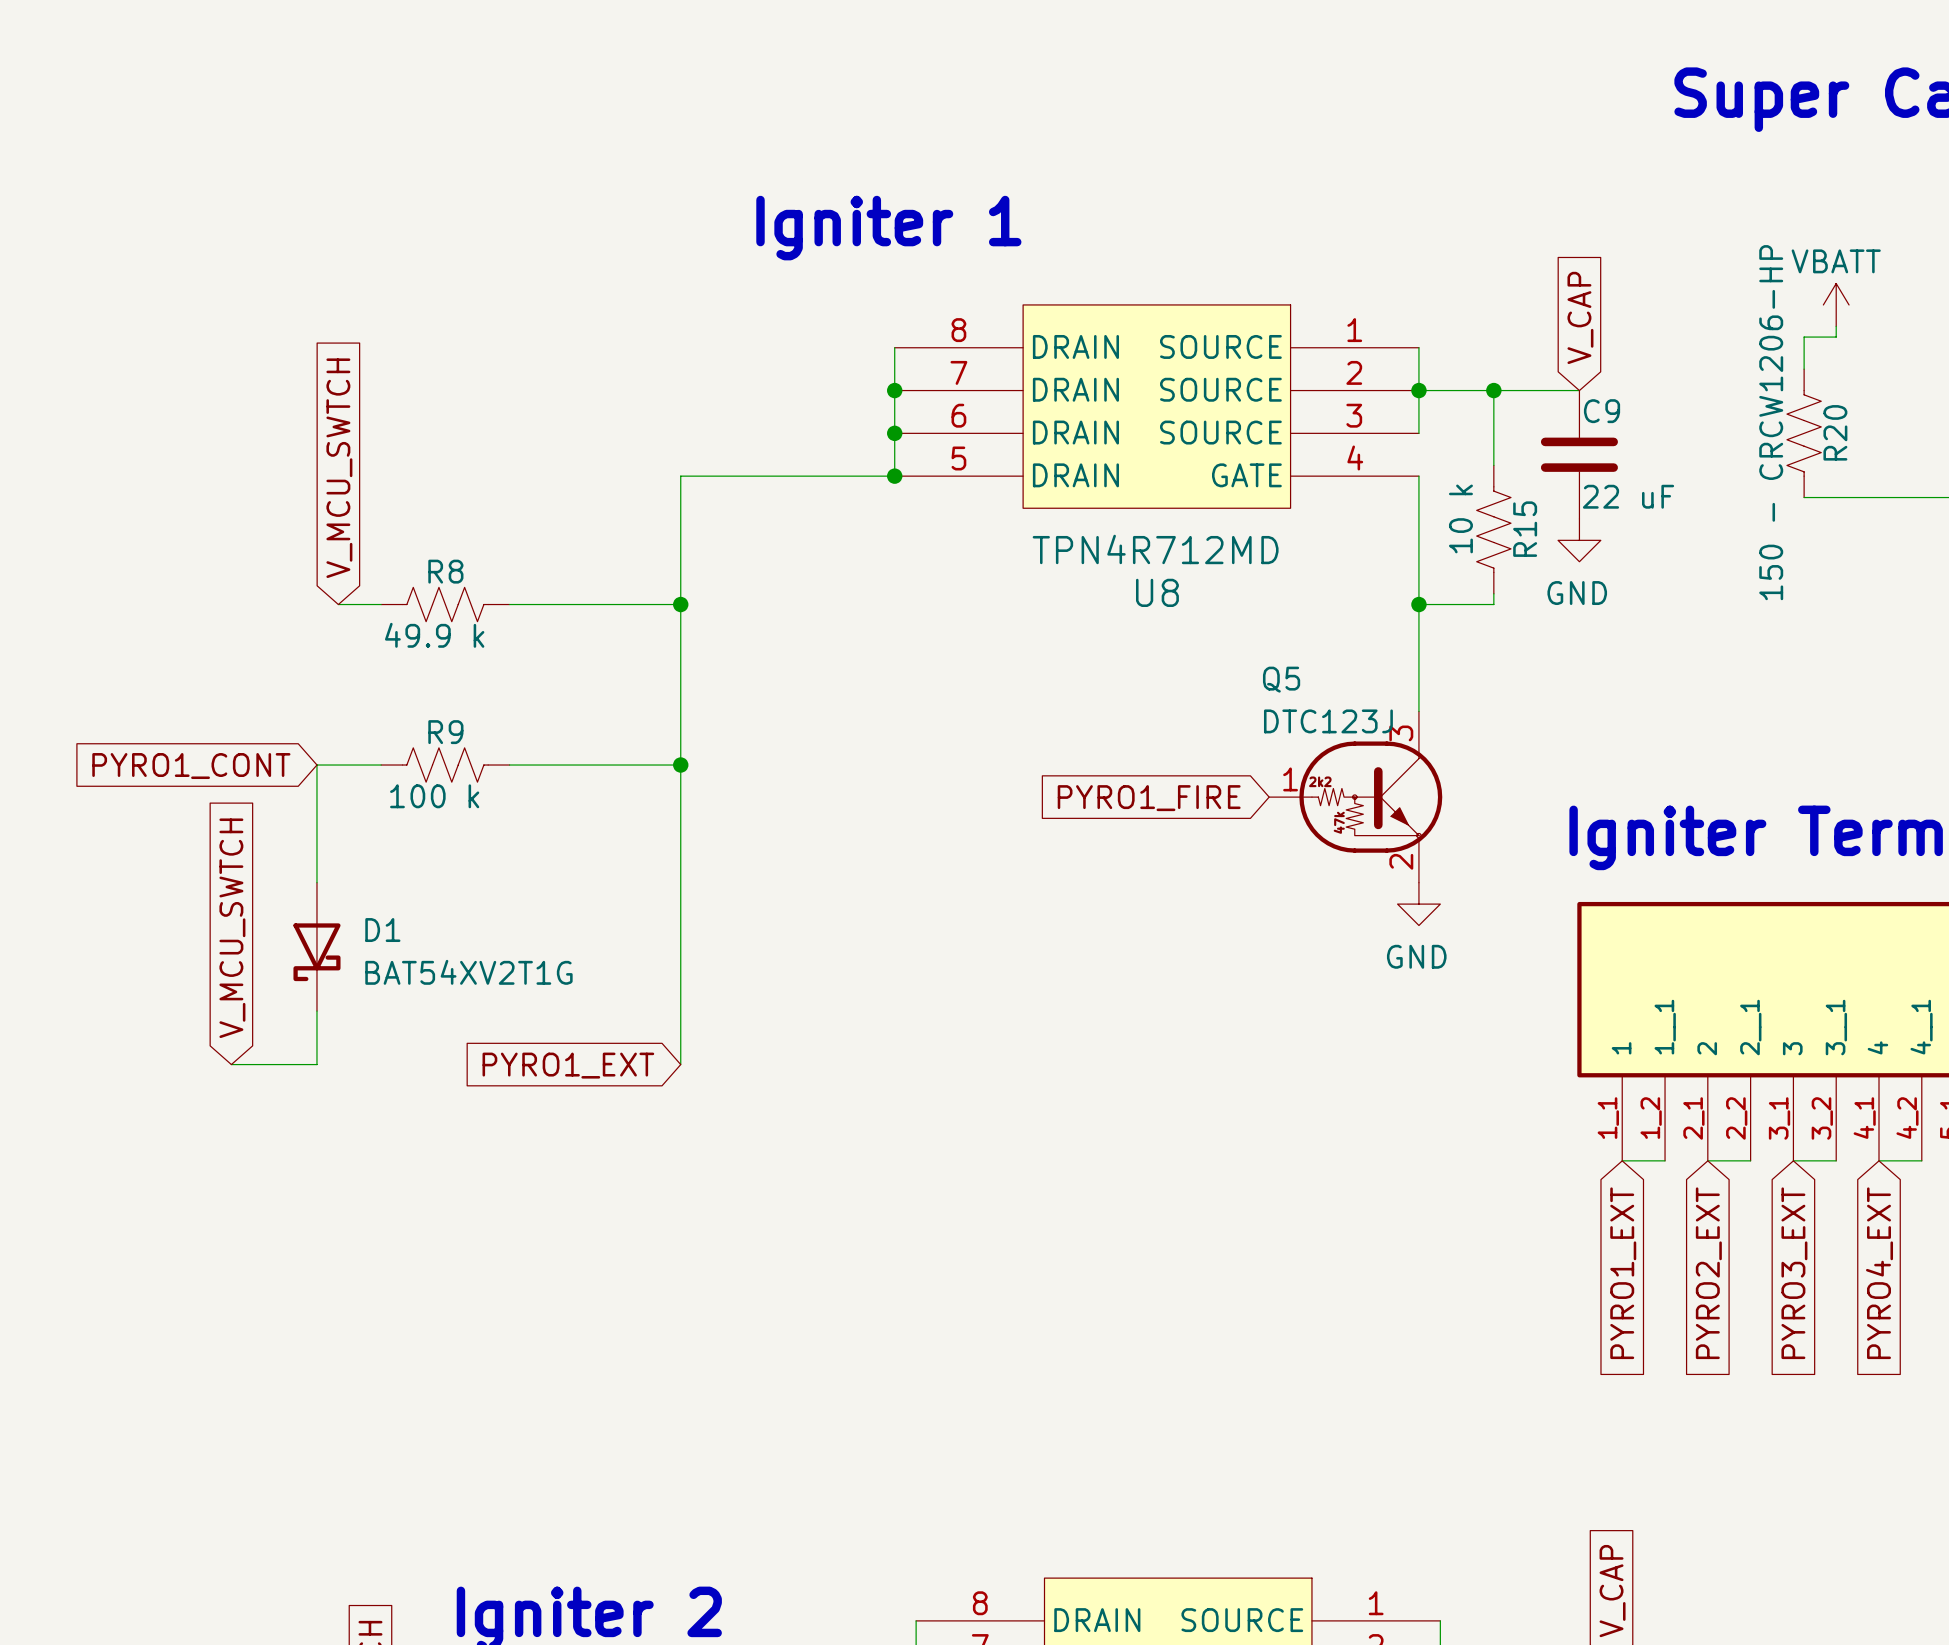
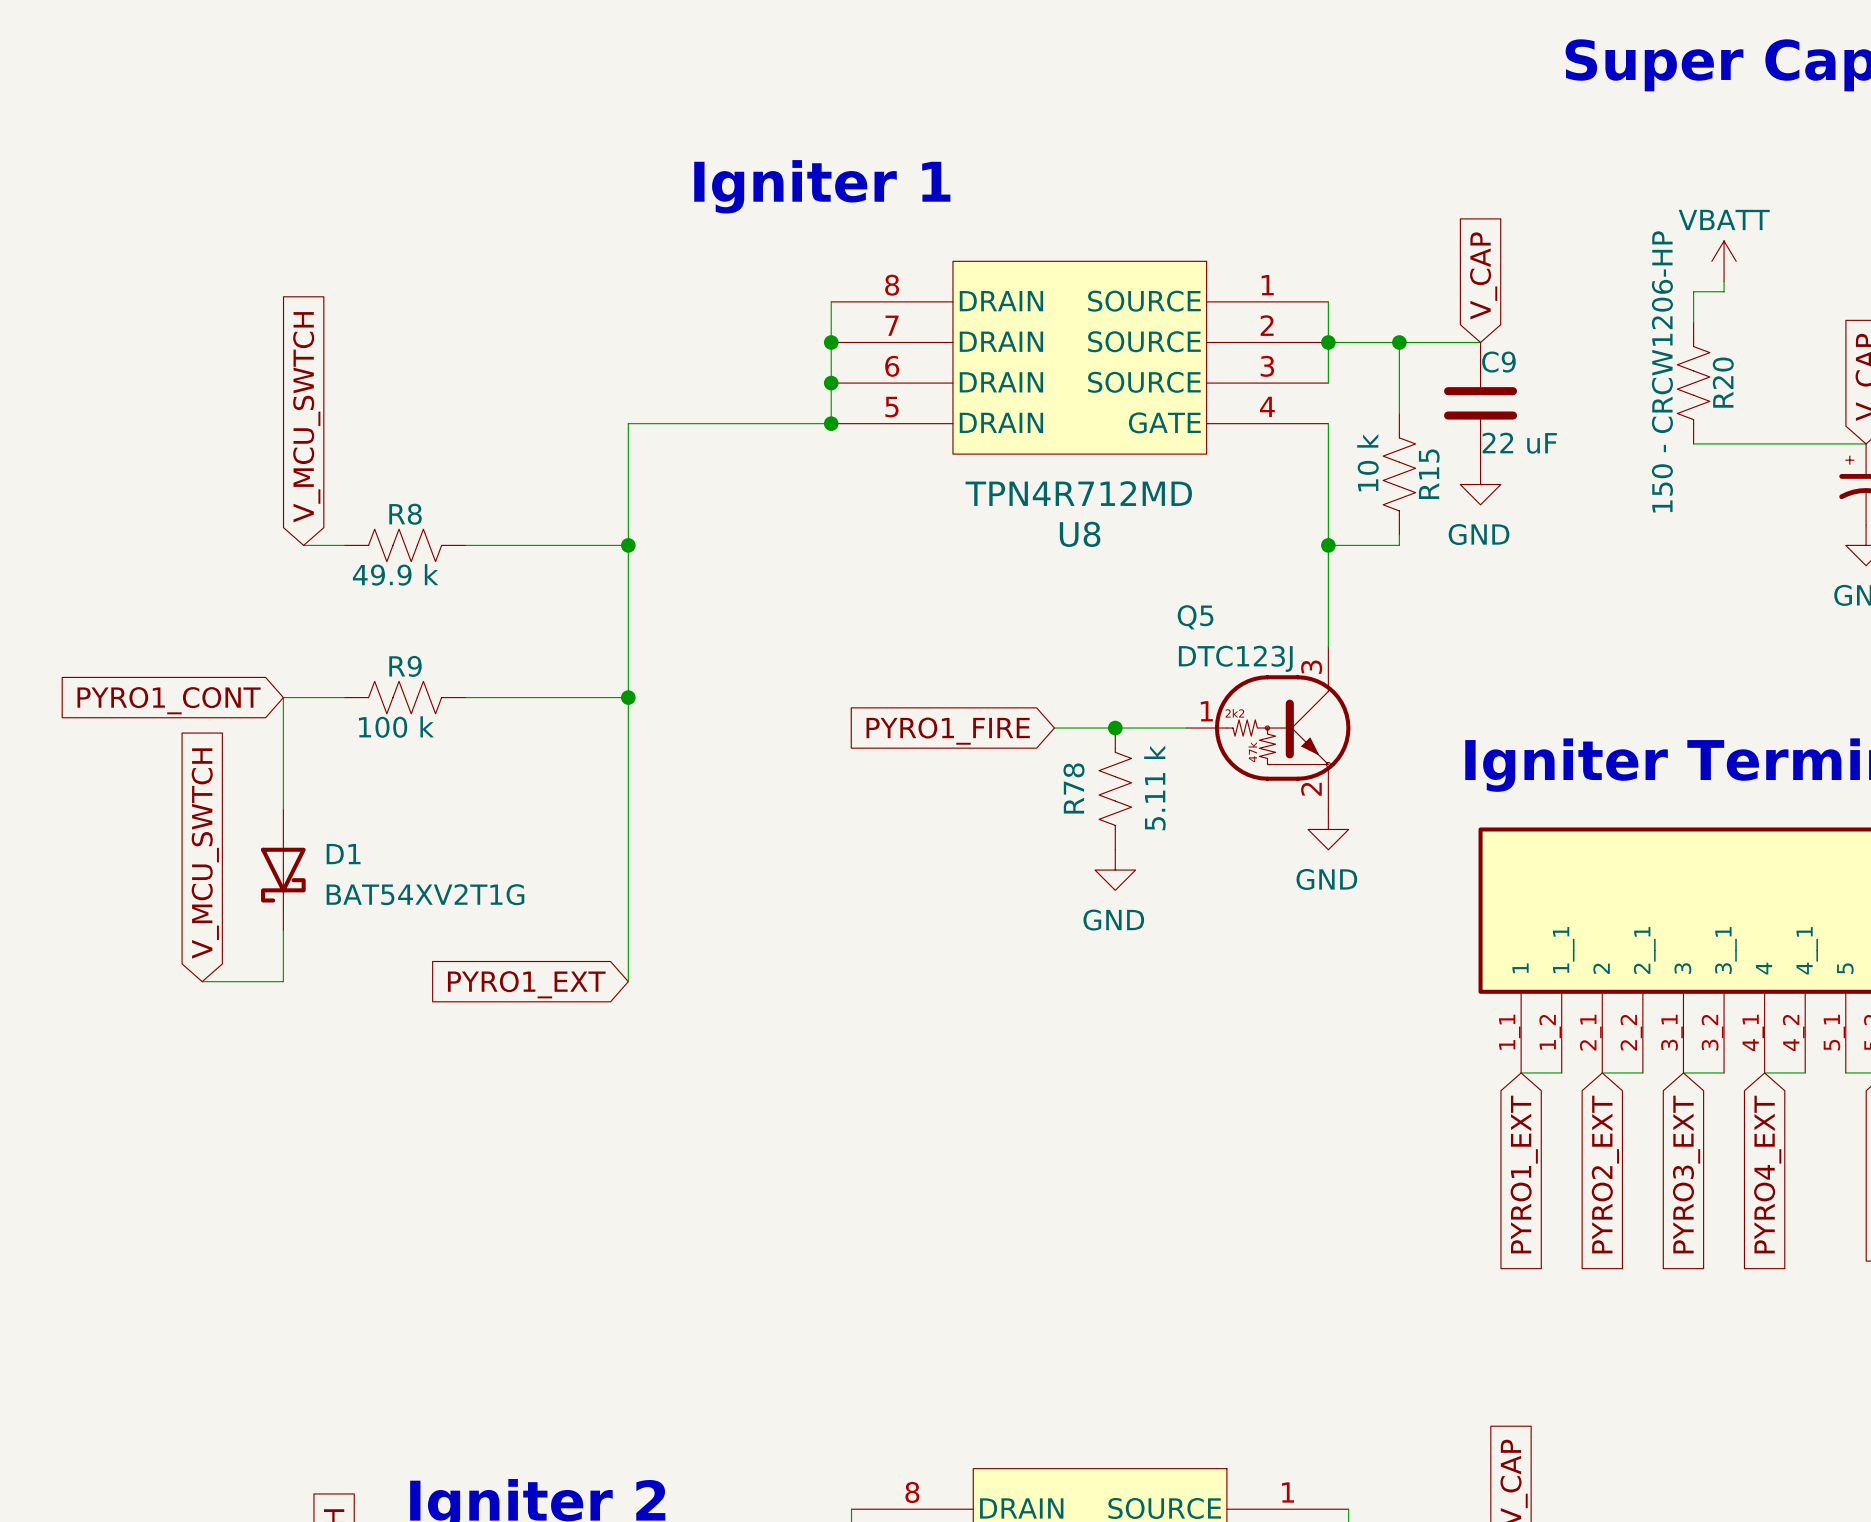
wire: none -> (1054, 728) (1186, 728)
junction: none -> (1115, 728)
global label position: PYRO1_FIRE (1149, 798) -> PYRO1_FIRE (948, 731)
R78: none -> 5.11 k (1115, 788)
power symbol: none -> GND (1115, 870)

